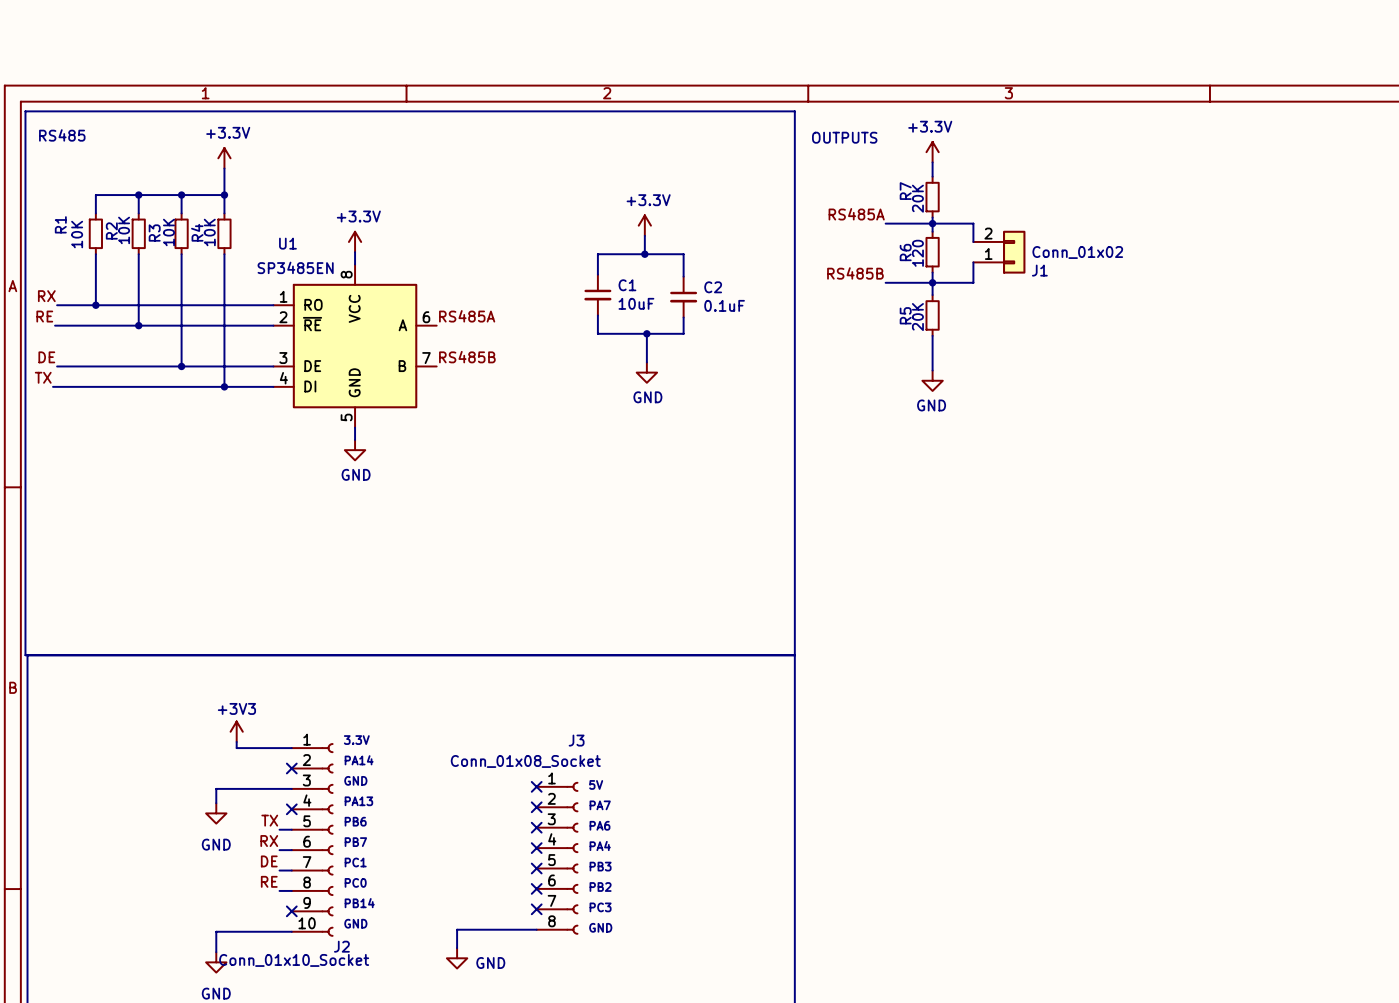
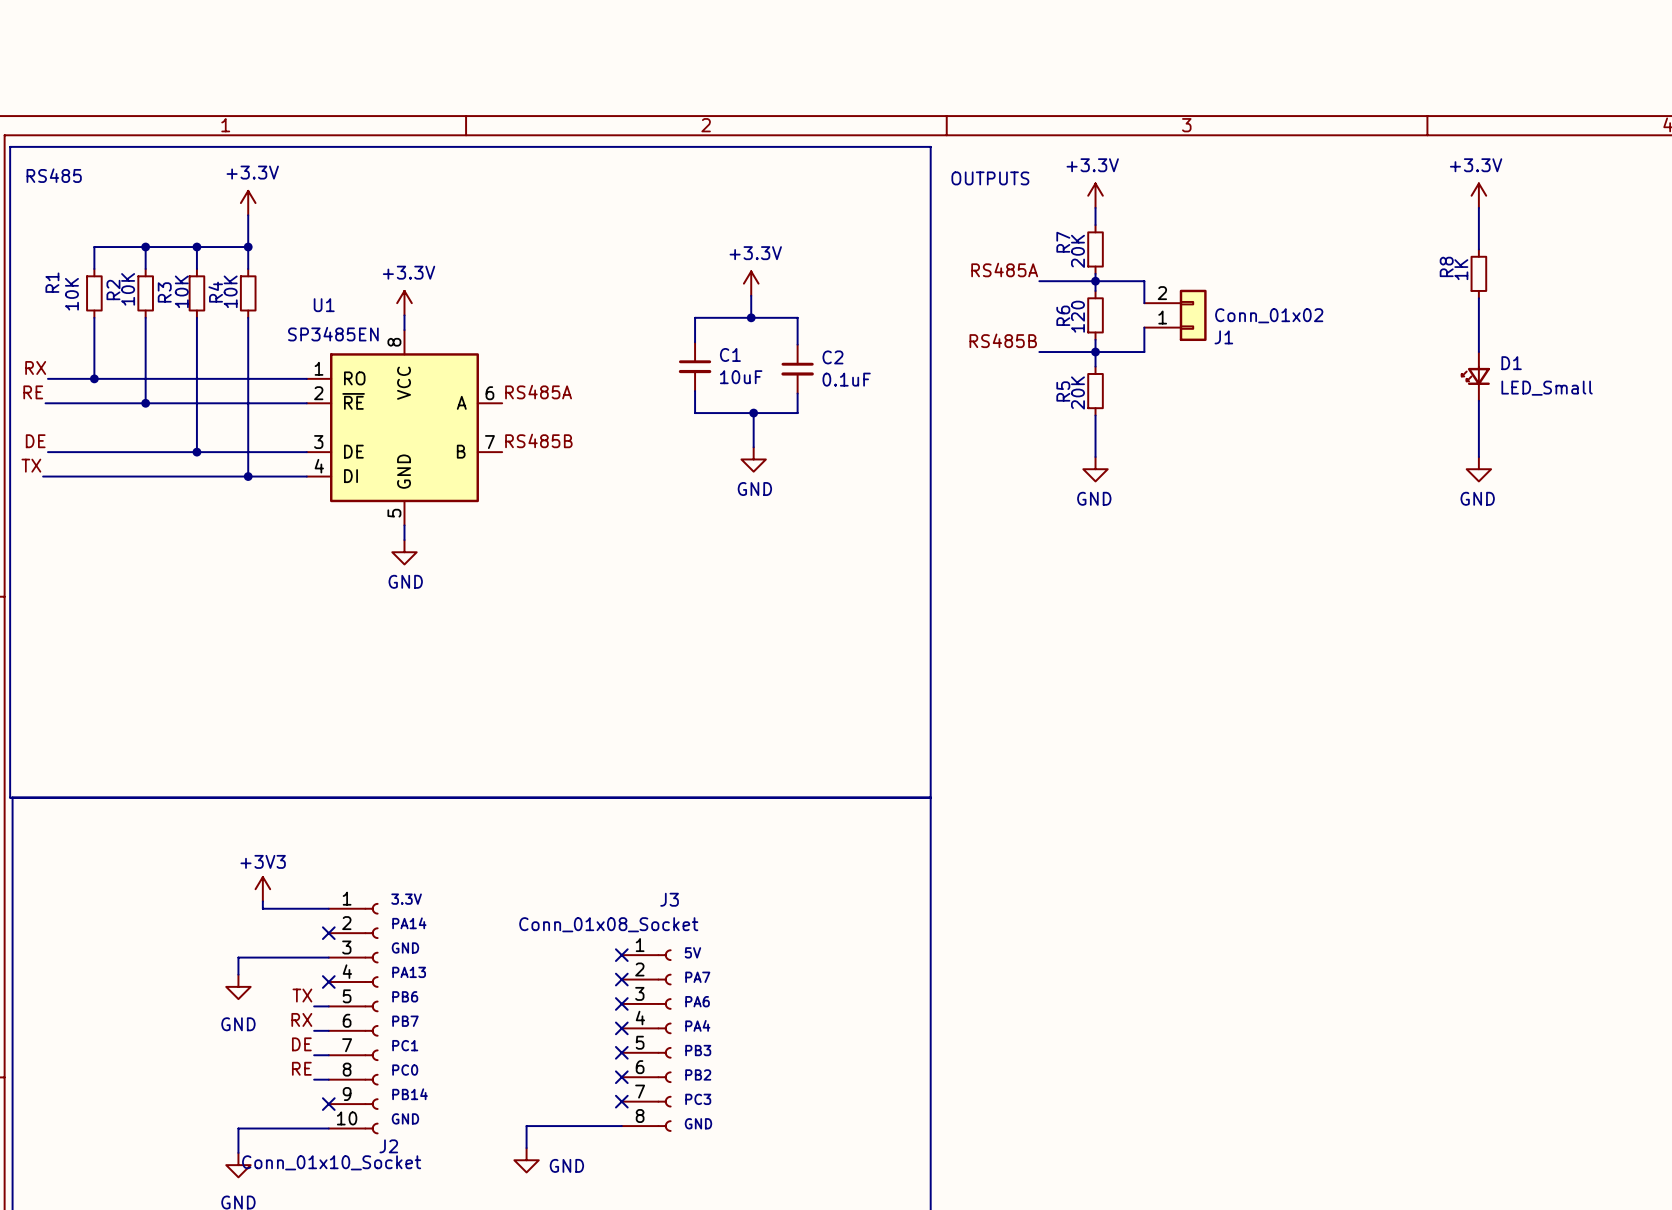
power symbol: none -> +3.3V (1478, 195)
wire: none -> (1478, 207) (1478, 249)
R8: none -> 1K (1478, 273)
wire: none -> (1478, 298) (1478, 352)
D1: none -> LED_Small (1475, 376)
wire: none -> (1478, 400) (1478, 457)
power symbol: none -> GND (1478, 469)

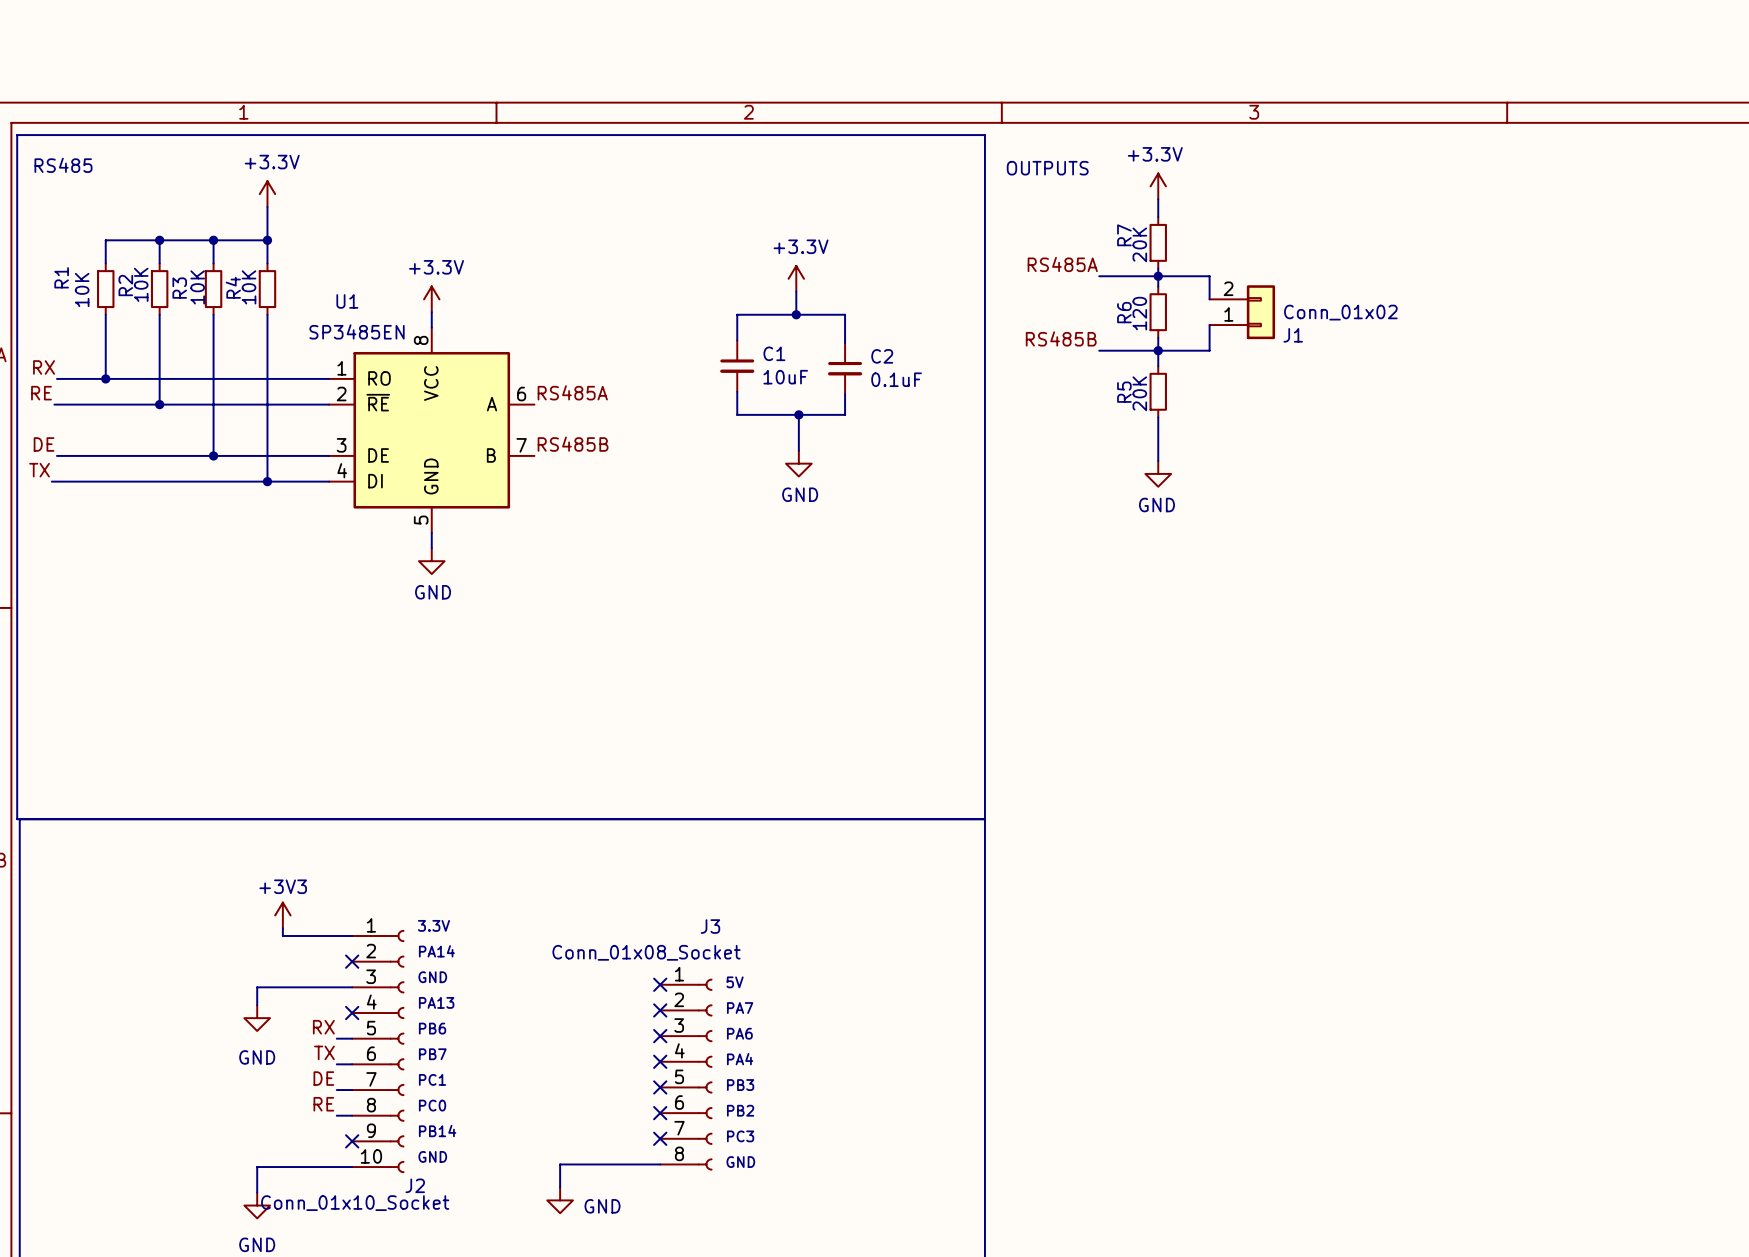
power symbol: +3.3V (1478, 195) -> none
wire: (1478, 207) (1478, 249) -> none
R8: 1K (1478, 273) -> none
wire: (1478, 298) (1478, 352) -> none
D1: LED_Small (1475, 376) -> none
wire: (1478, 400) (1478, 457) -> none
power symbol: GND (1478, 469) -> none
label: TX (302, 995) -> RX (323, 1027)
label: RX (301, 1019) -> TX (324, 1052)

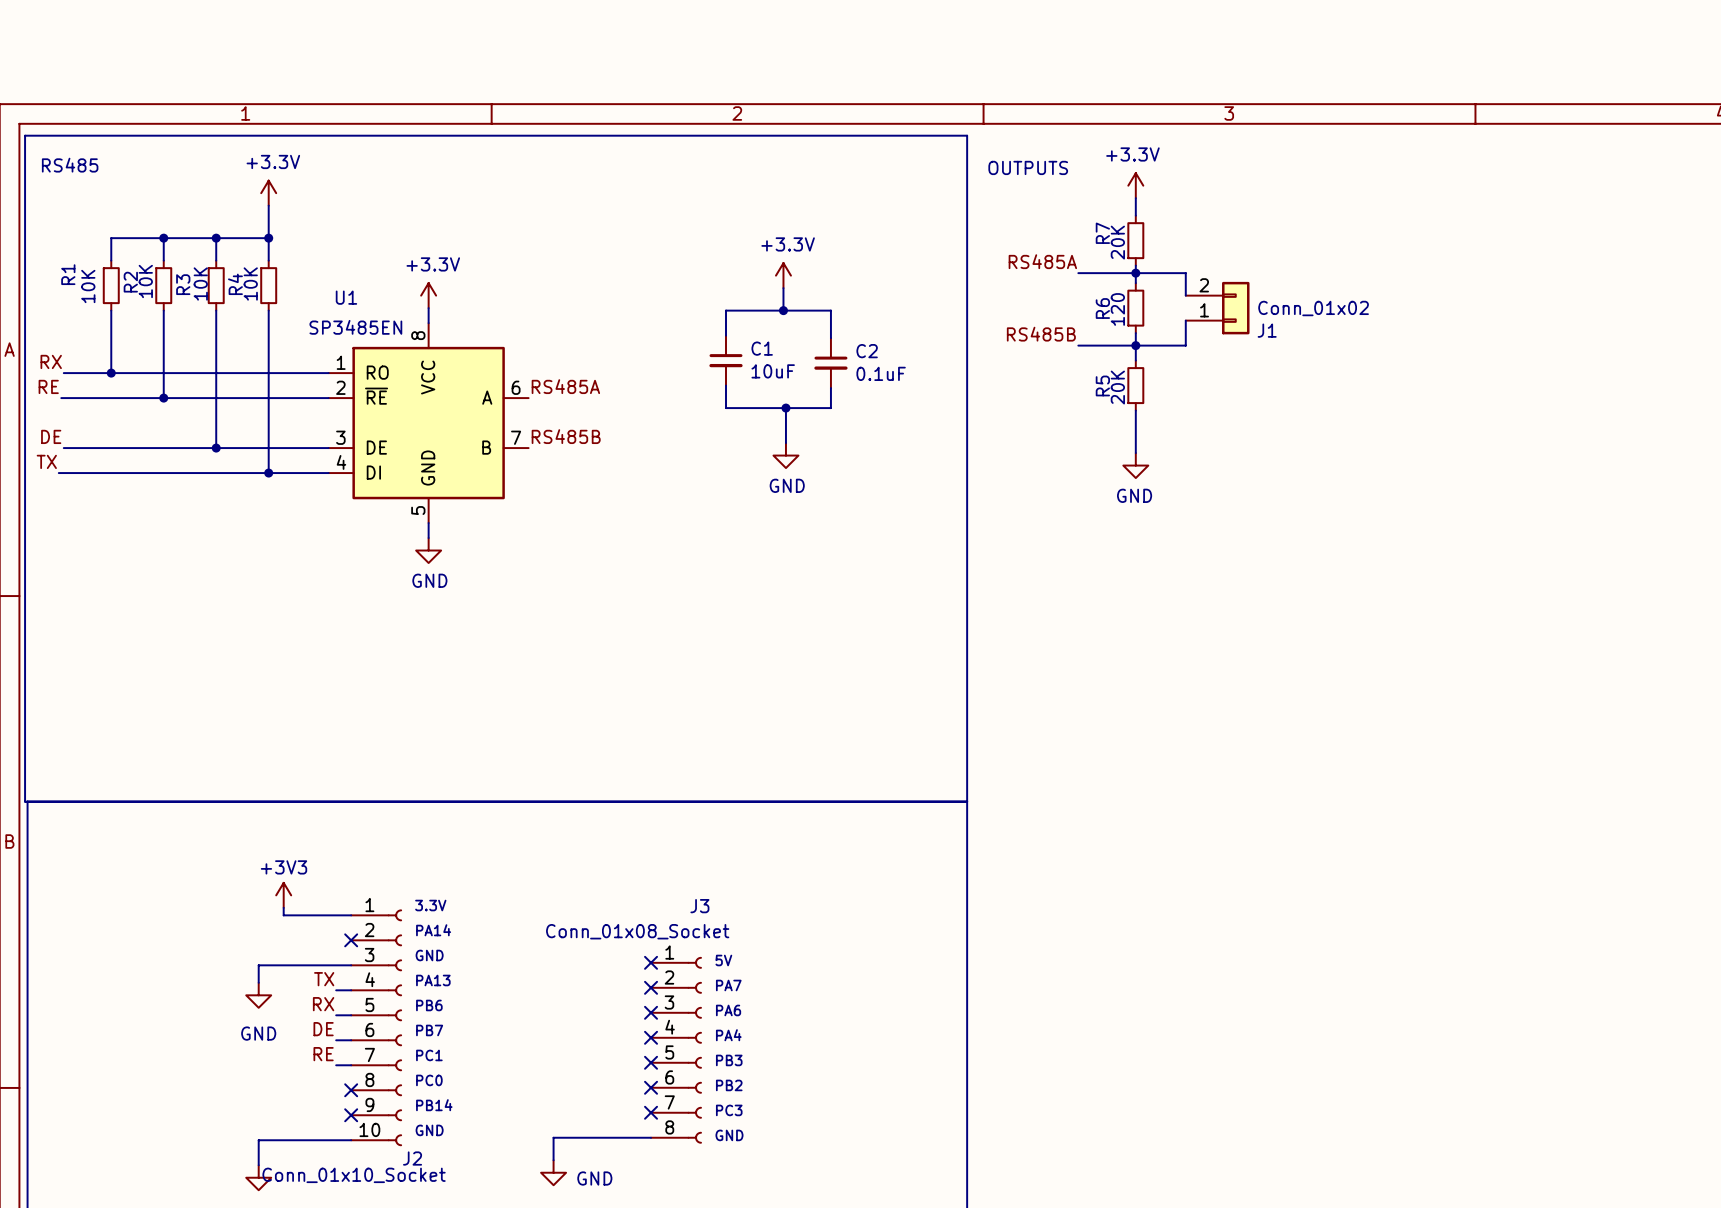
label: none -> TX (324, 979)
no-connect mark: (352, 1013) -> none
label: TX (324, 1052) -> DE (323, 1029)
label: DE (323, 1078) -> RE (323, 1054)
label: RE (323, 1104) -> none
wire: (336, 1115) (352, 1115) -> (336, 990) (351, 990)
no-connect mark: none -> (351, 1090)

